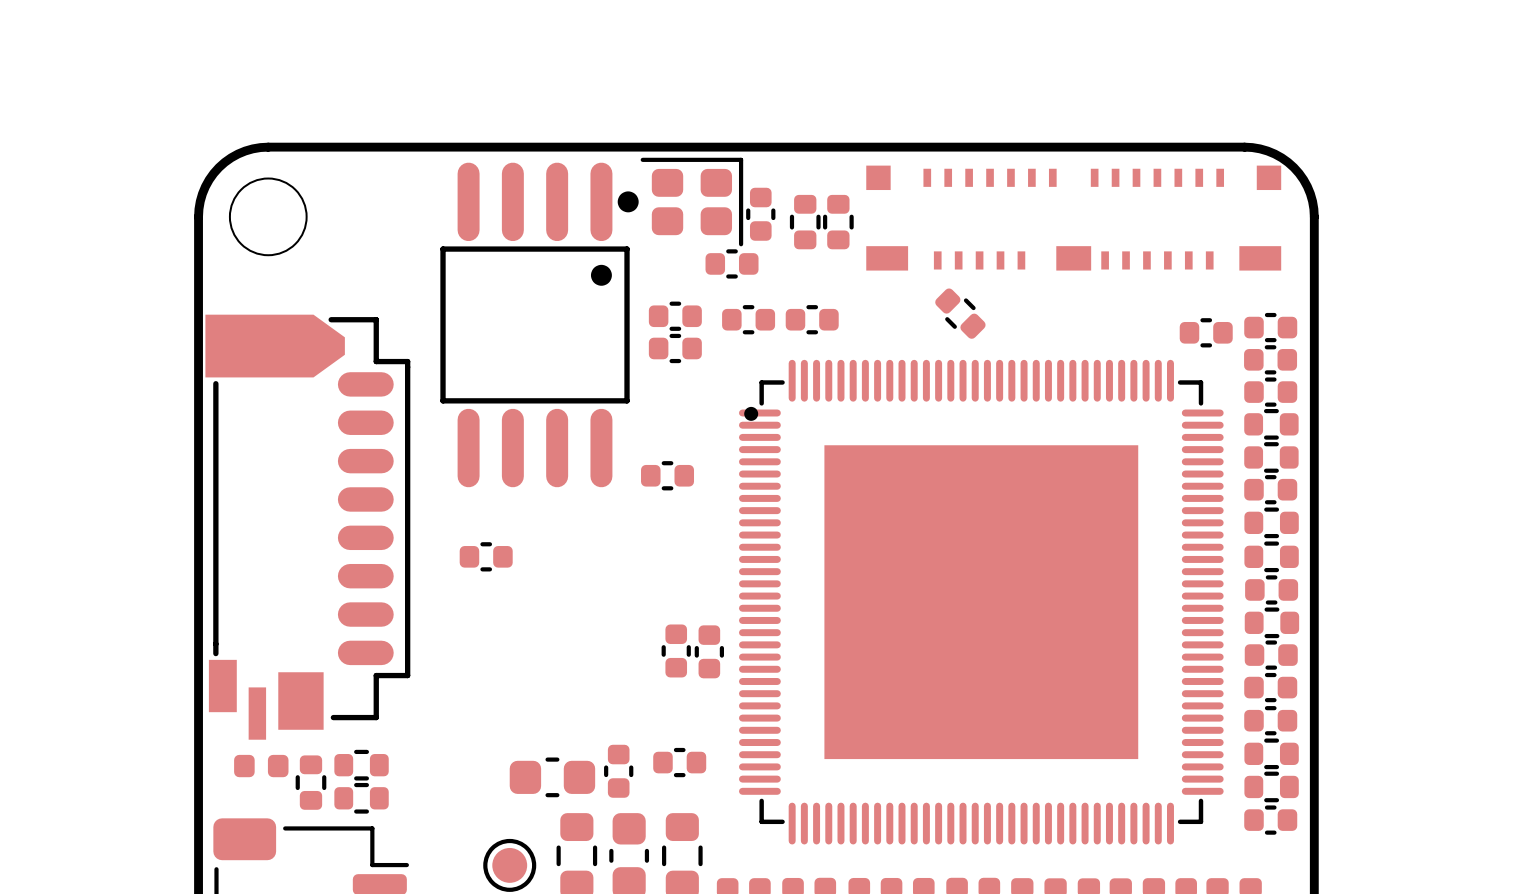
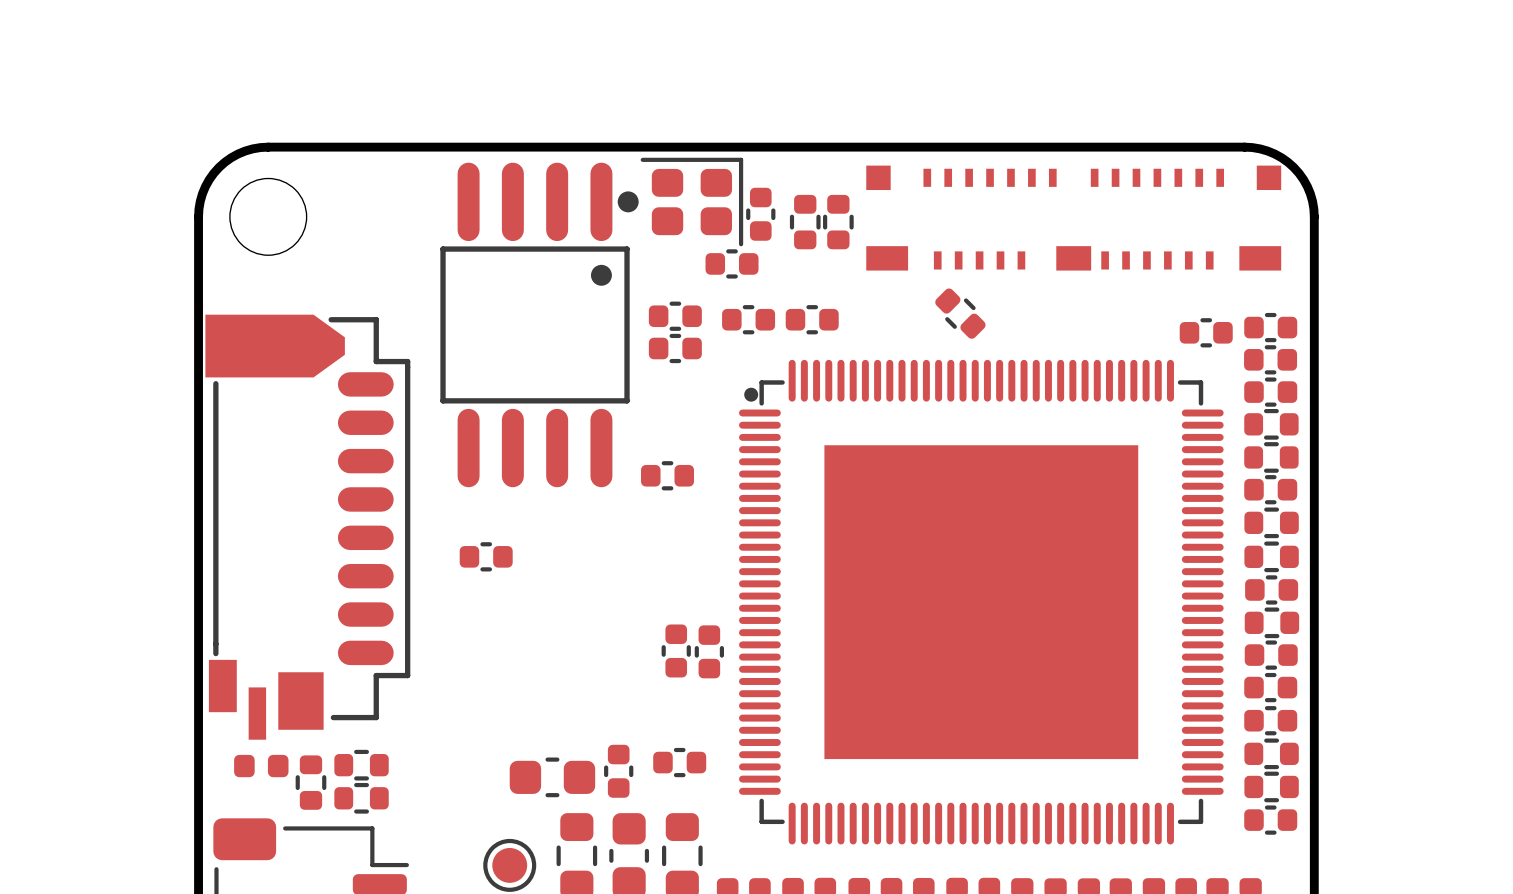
part footprint: [738, 359, 1224, 845] -> [738, 359, 1224, 845]

